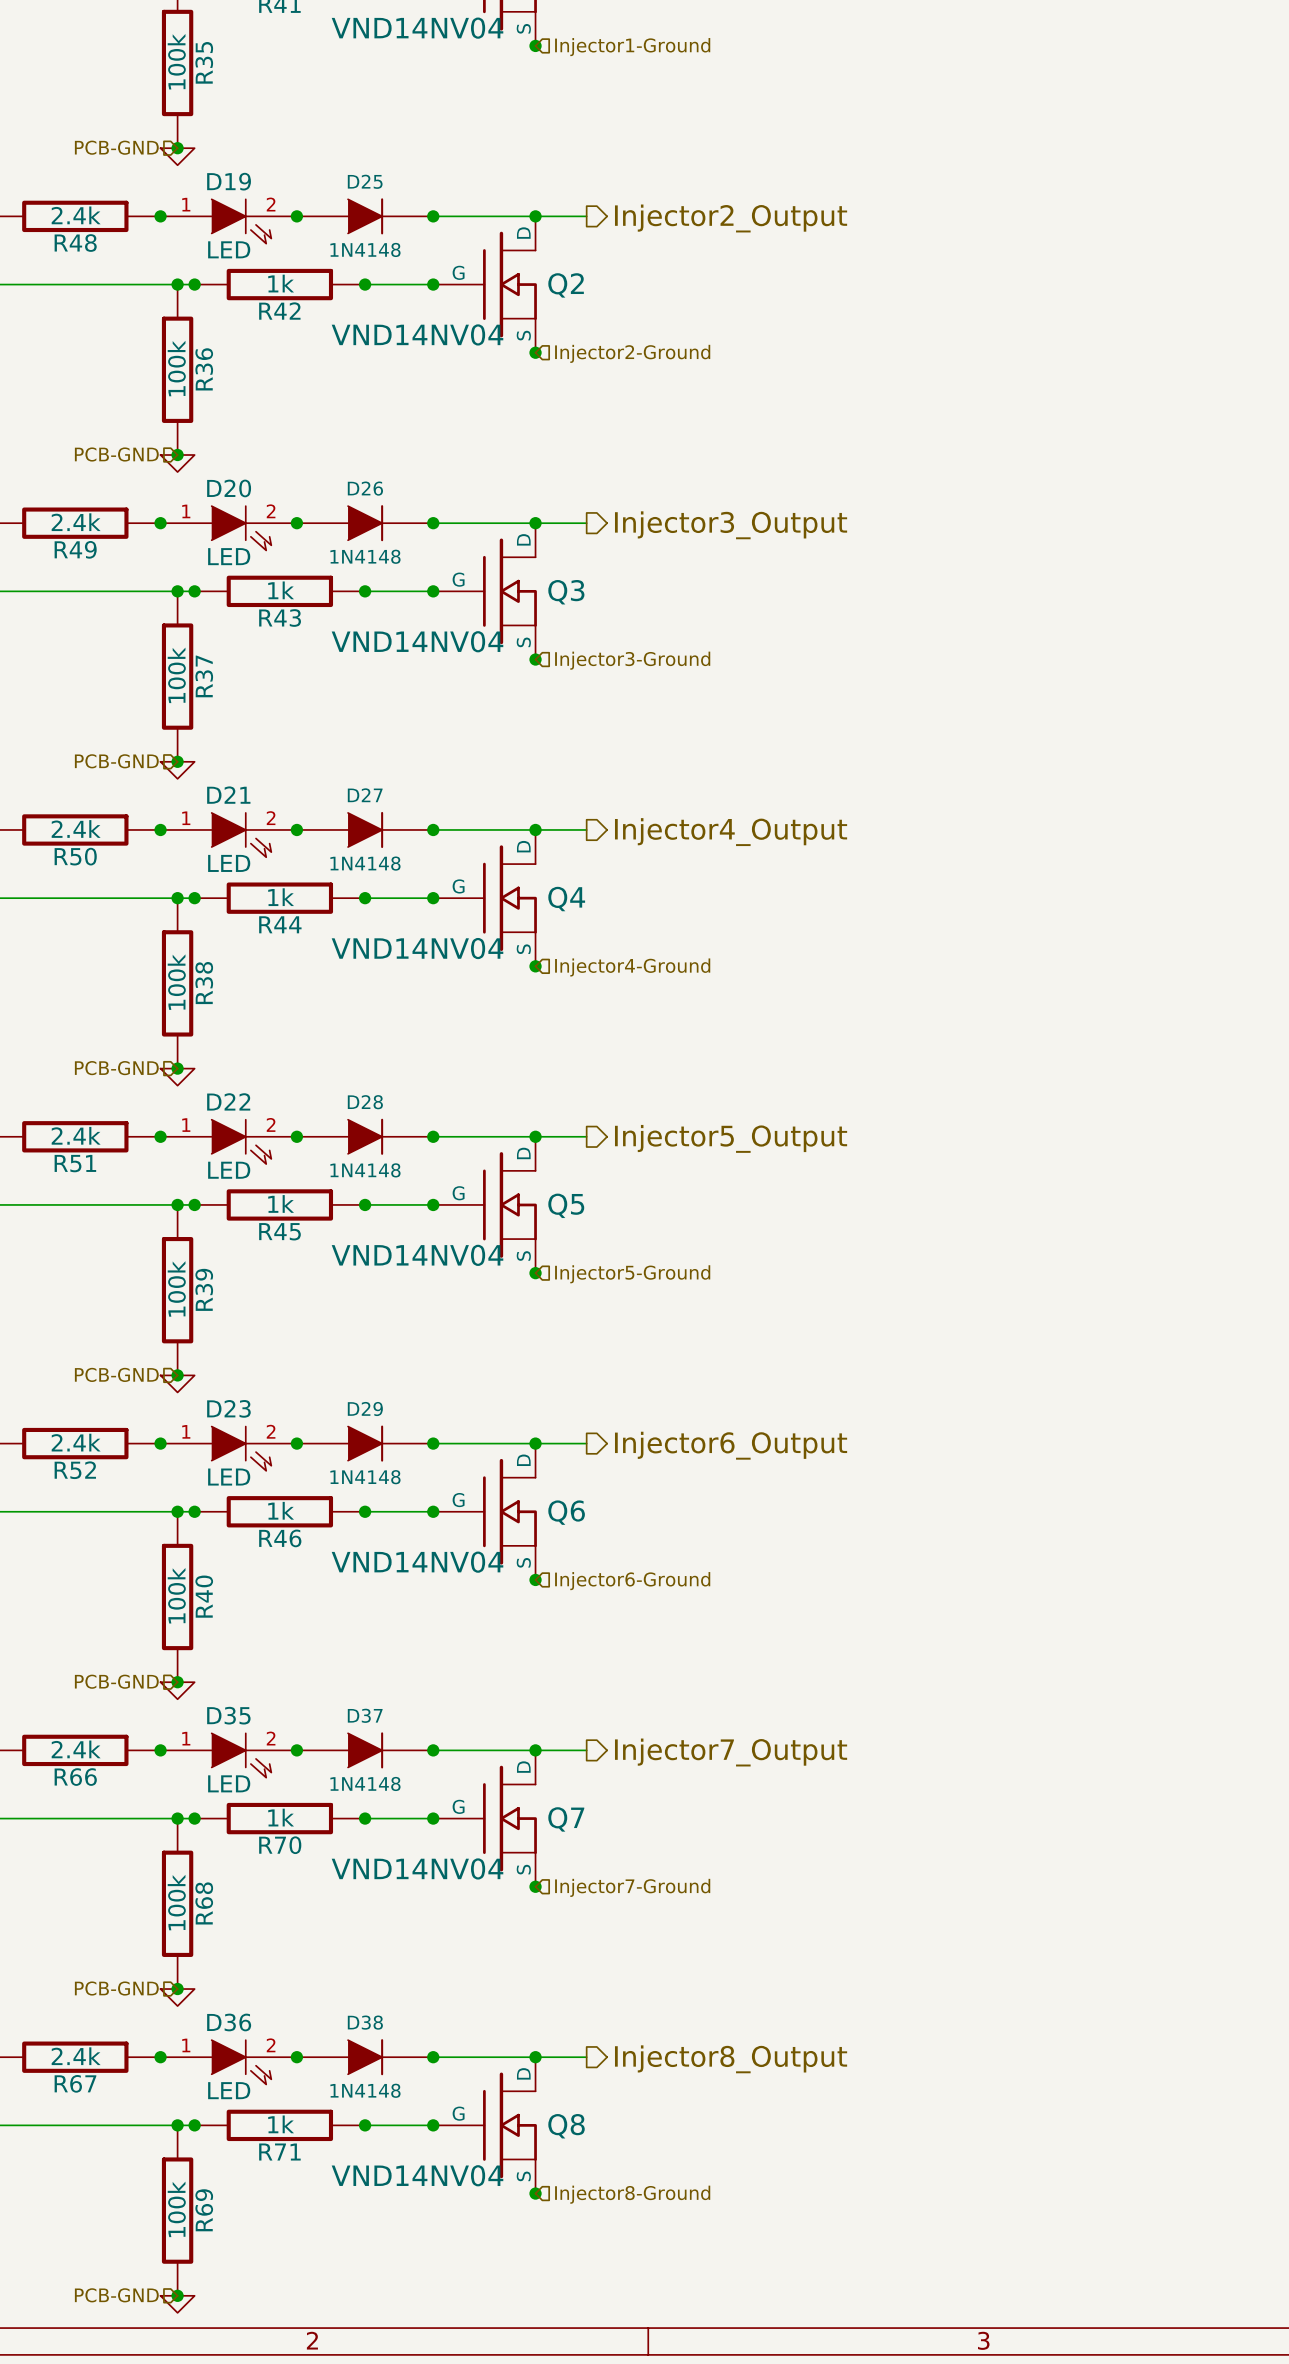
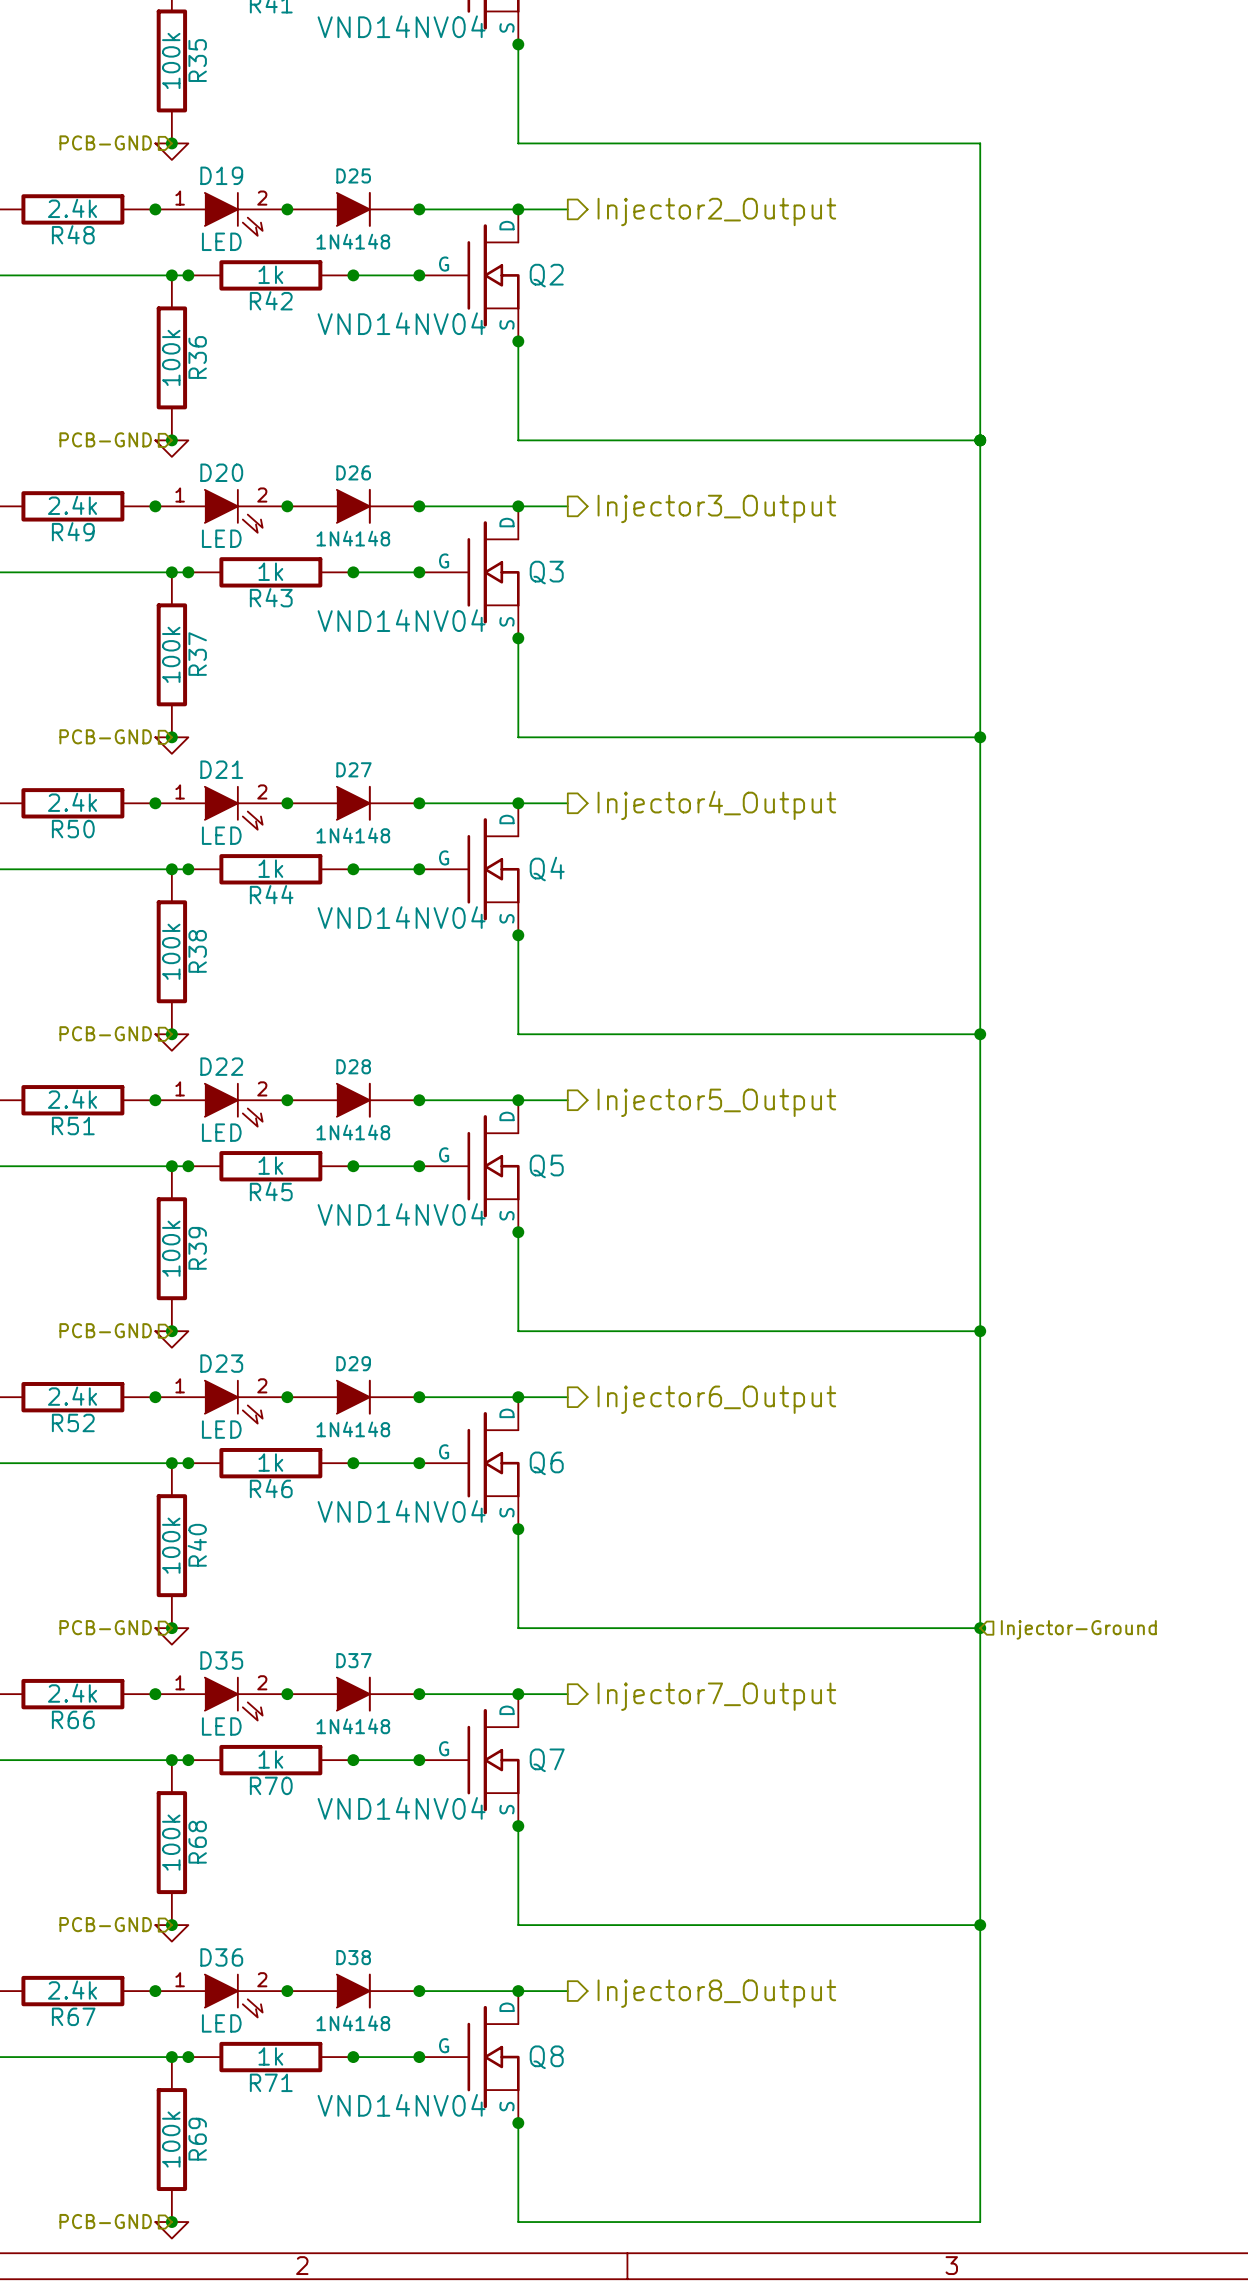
wire: none -> (518, 44) (518, 143) (980, 143) (980, 2222) (518, 2222) (518, 2123)
hierarchical label: Injector1-Ground (632, 47) -> none
wire: none -> (518, 341) (518, 440) (980, 440)
hierarchical label: Injector2-Ground (632, 353) -> none
junction: none -> (980, 440)
wire: none -> (518, 638) (518, 737) (980, 737)
hierarchical label: Injector3-Ground (632, 660) -> none
junction: none -> (980, 737)
wire: none -> (518, 935) (518, 1034) (980, 1034)
hierarchical label: Injector4-Ground (632, 967) -> none
junction: none -> (980, 1034)
wire: none -> (518, 1232) (518, 1331) (980, 1331)
hierarchical label: Injector5-Ground (632, 1274) -> none
junction: none -> (980, 1331)
wire: none -> (518, 1529) (518, 1628) (980, 1628)
hierarchical label: Injector6-Ground (632, 1581) -> none
junction: none -> (980, 1628)
hierarchical label: none -> Injector-Ground (1078, 1629)
wire: none -> (518, 1826) (518, 1925) (980, 1925)
hierarchical label: Injector7-Ground (632, 1887) -> none
junction: none -> (980, 1925)
hierarchical label: Injector8-Ground (632, 2194) -> none

